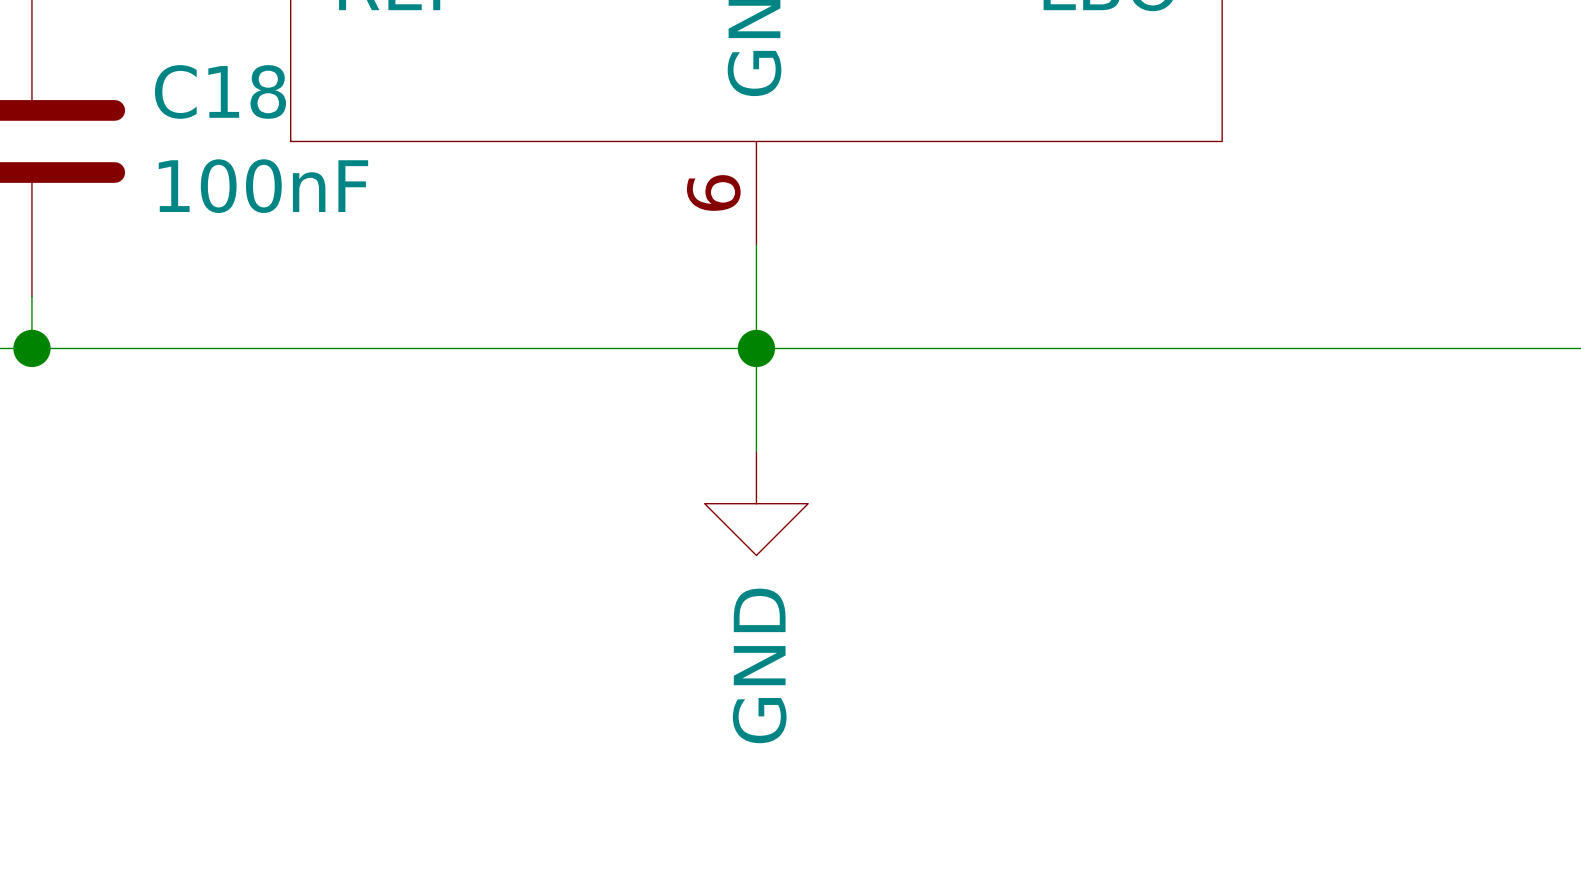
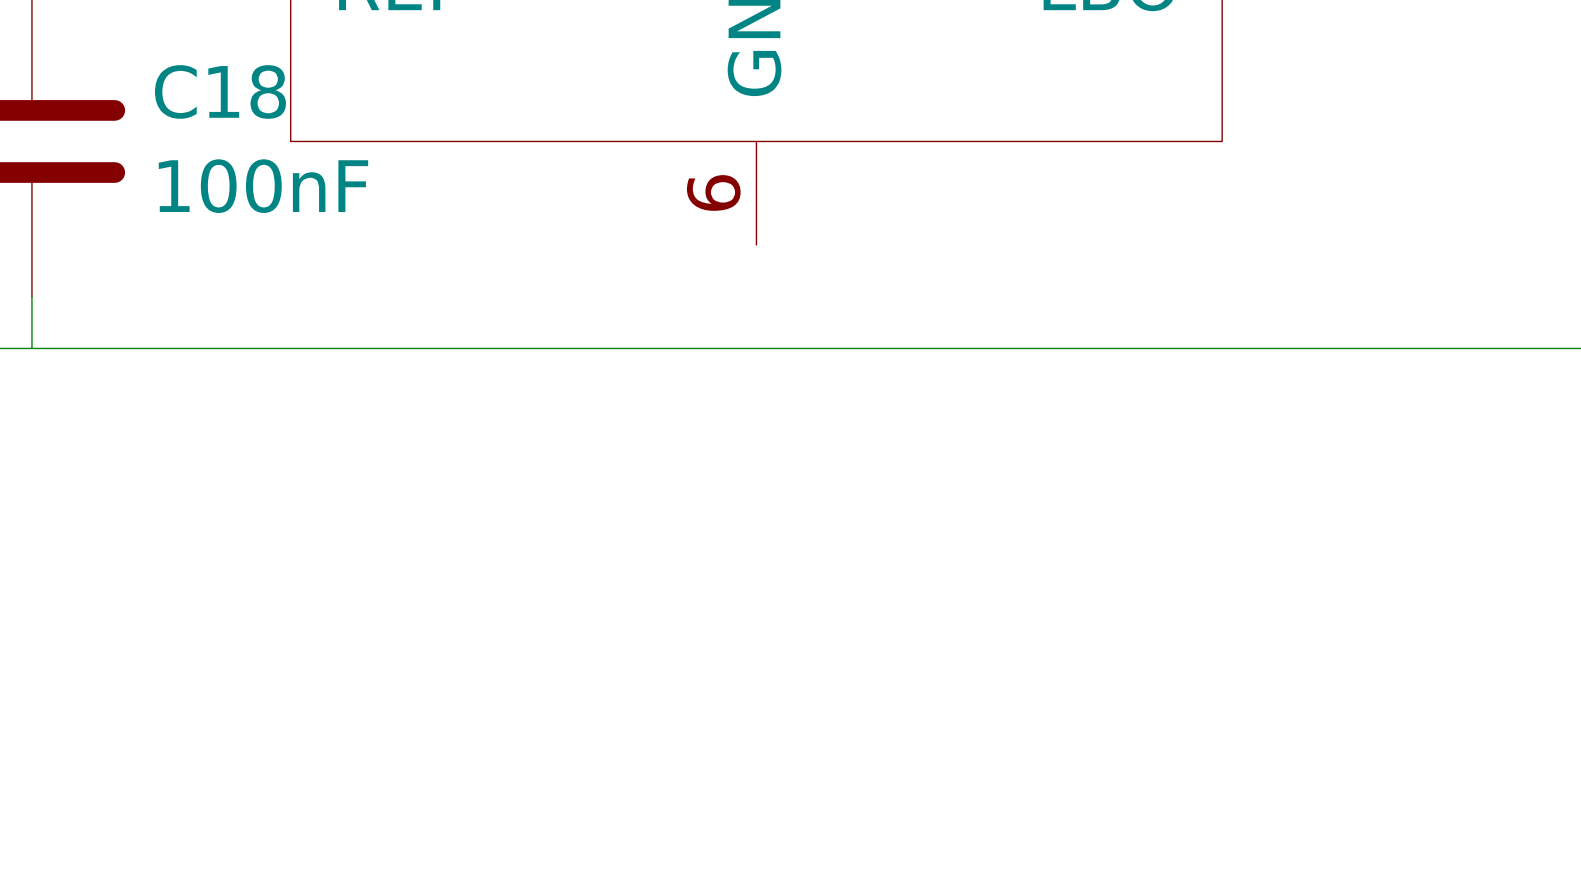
wire: (756, 244) (756, 451) -> none
junction: (31, 348) -> none
junction: (756, 348) -> none
power symbol: GND (756, 503) -> none

